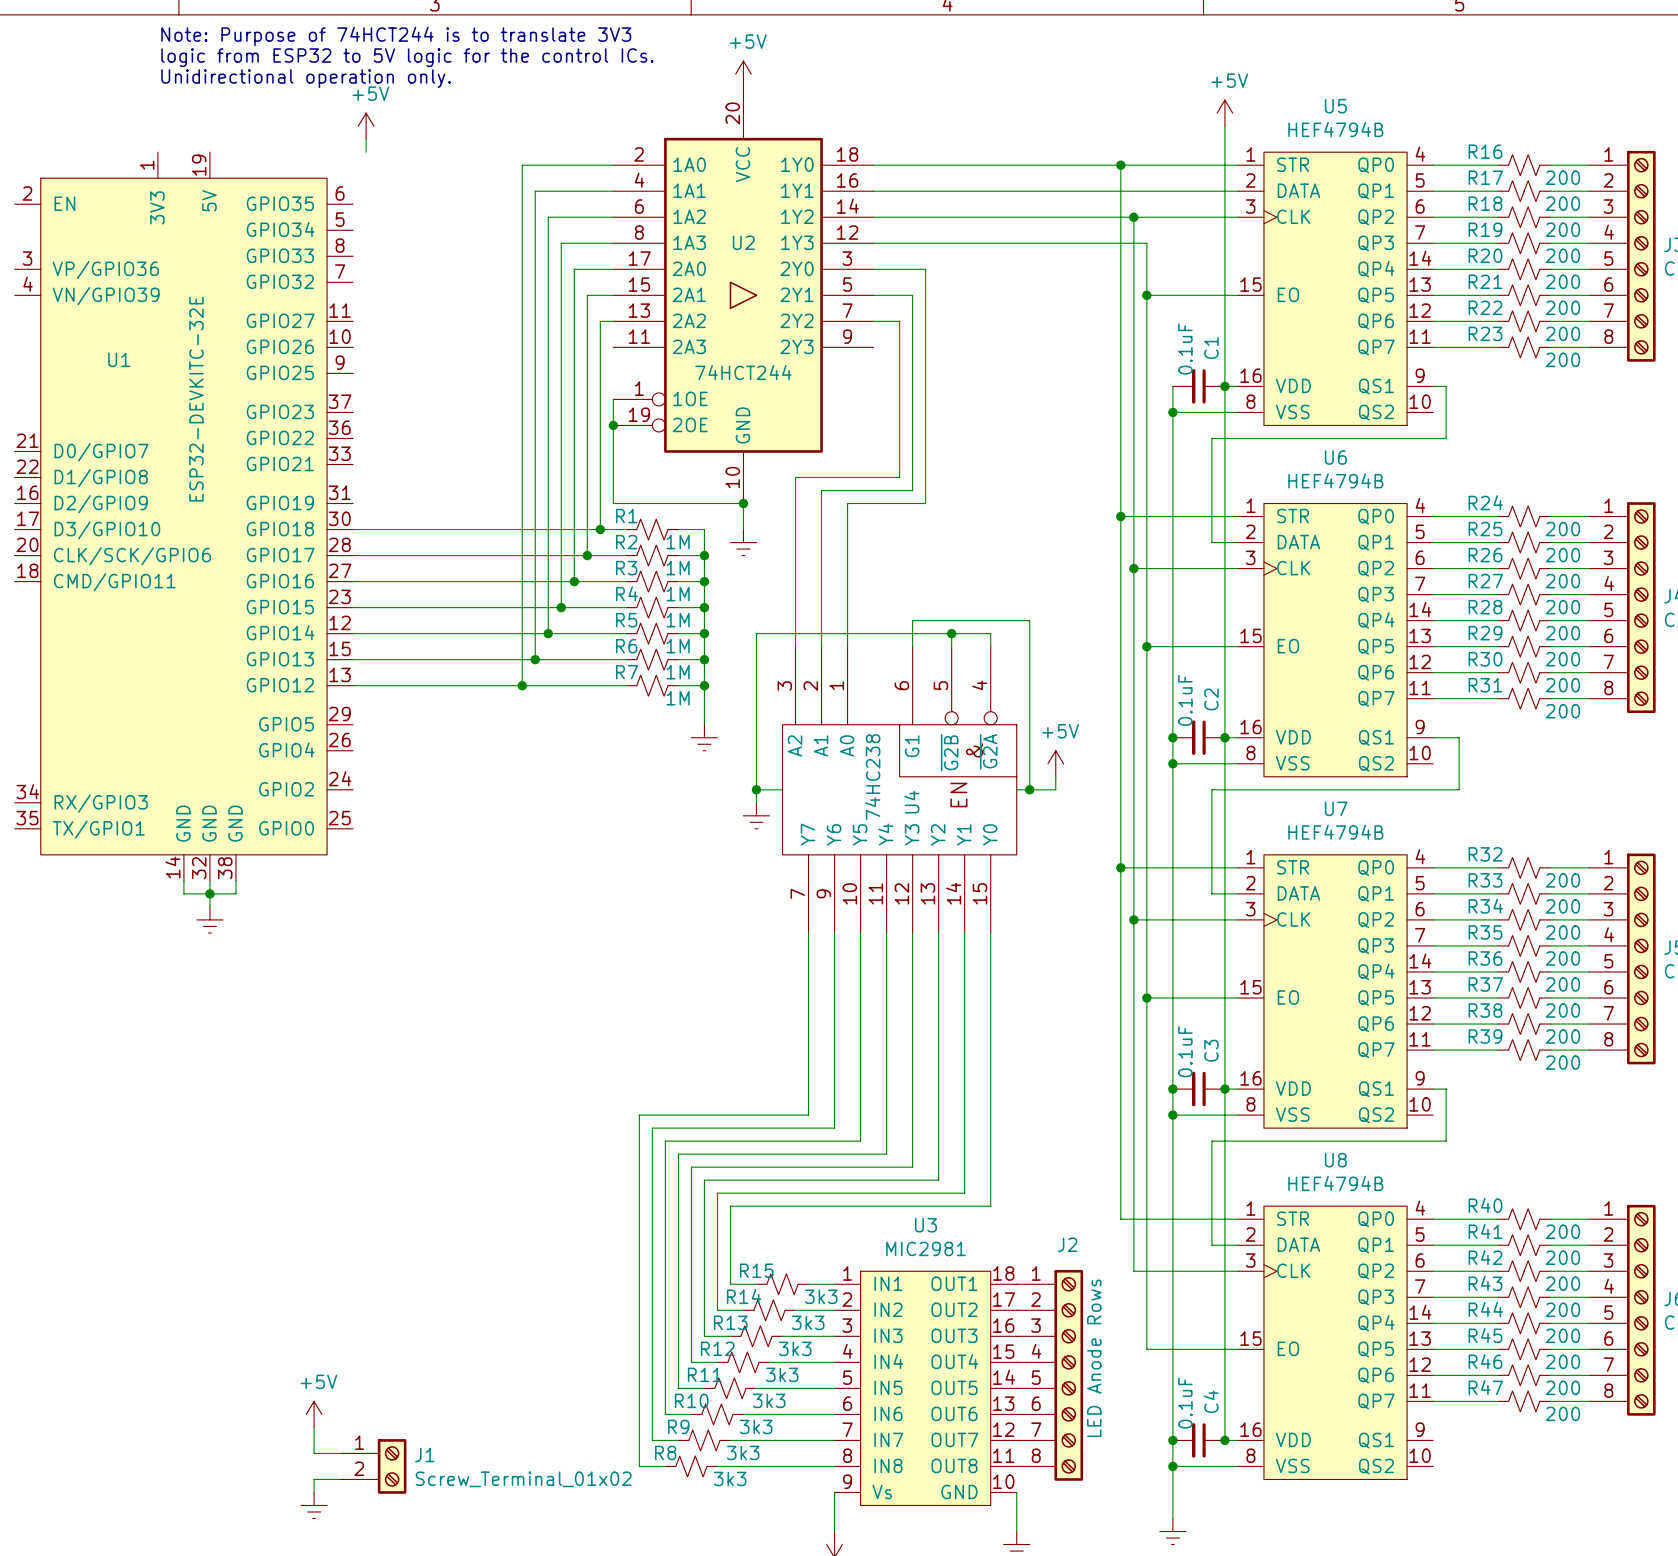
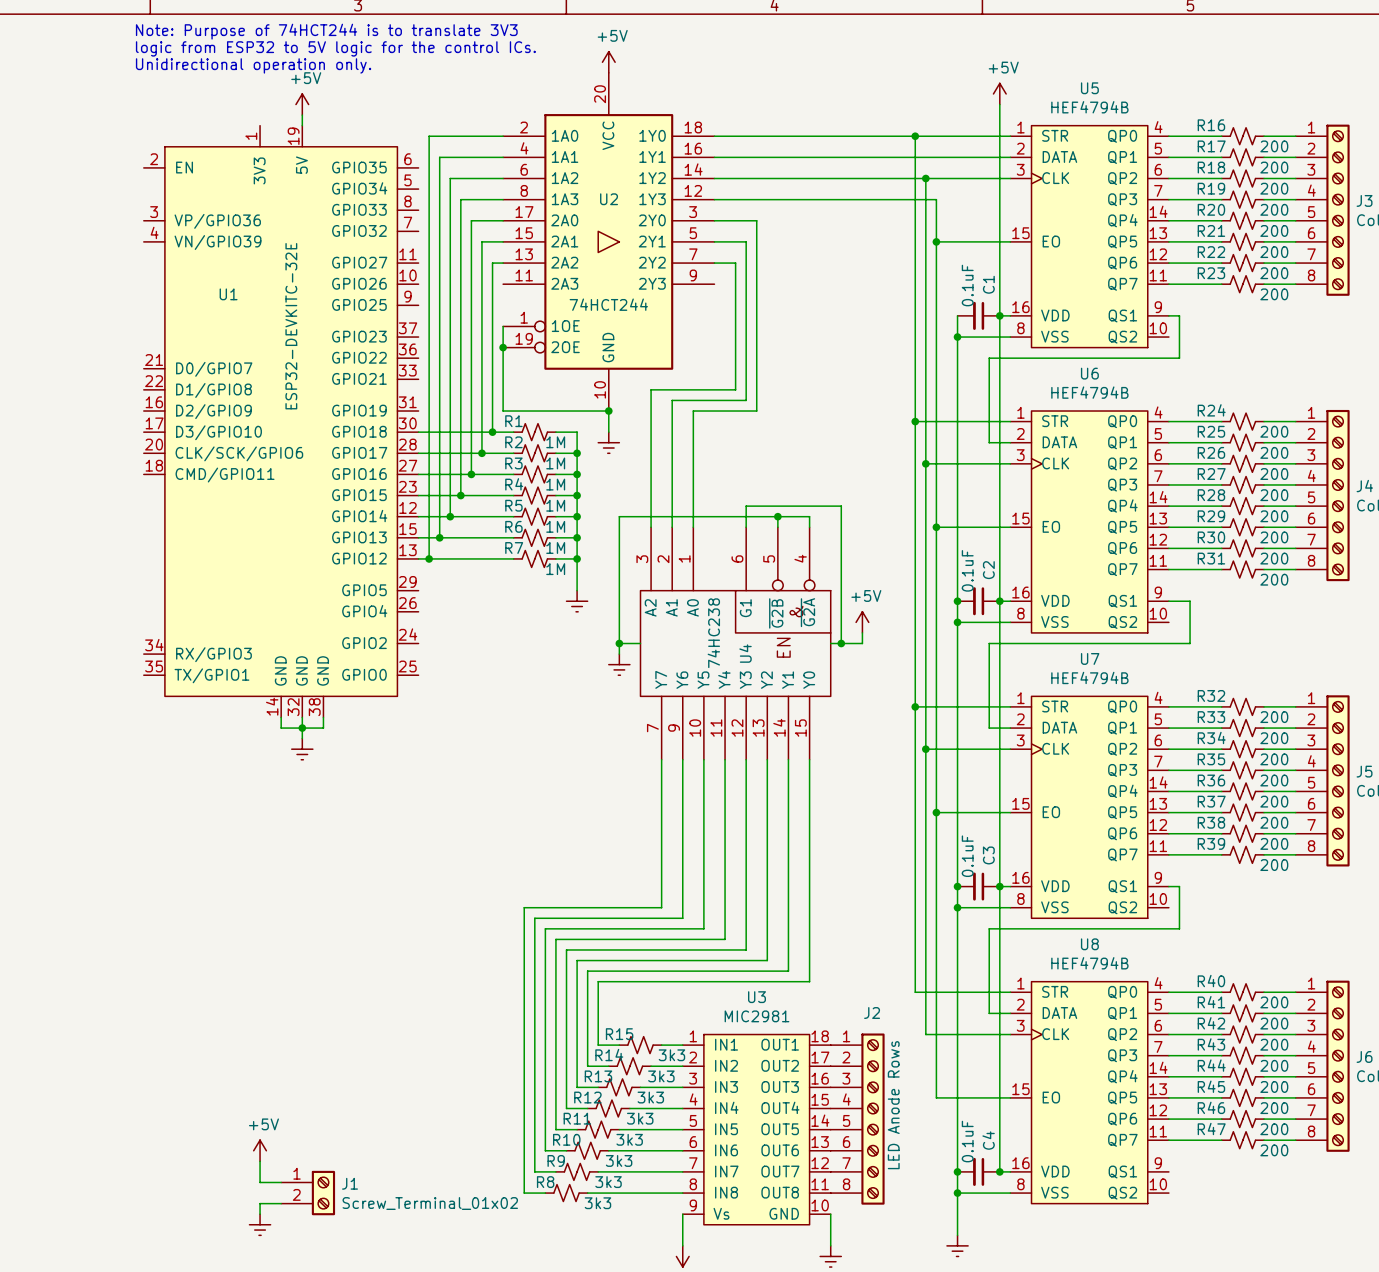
U1 position: (183, 516) -> (281, 421)
wire: (183, 880) (183, 893) (235, 893) (235, 880) -> (281, 717) (281, 728) (323, 728) (323, 717)
wire: (209, 880) (209, 906) -> (302, 717) (302, 738)
junction: (209, 893) -> none
junction: none -> (302, 728)
power symbol position: (209, 919) -> (302, 749)

